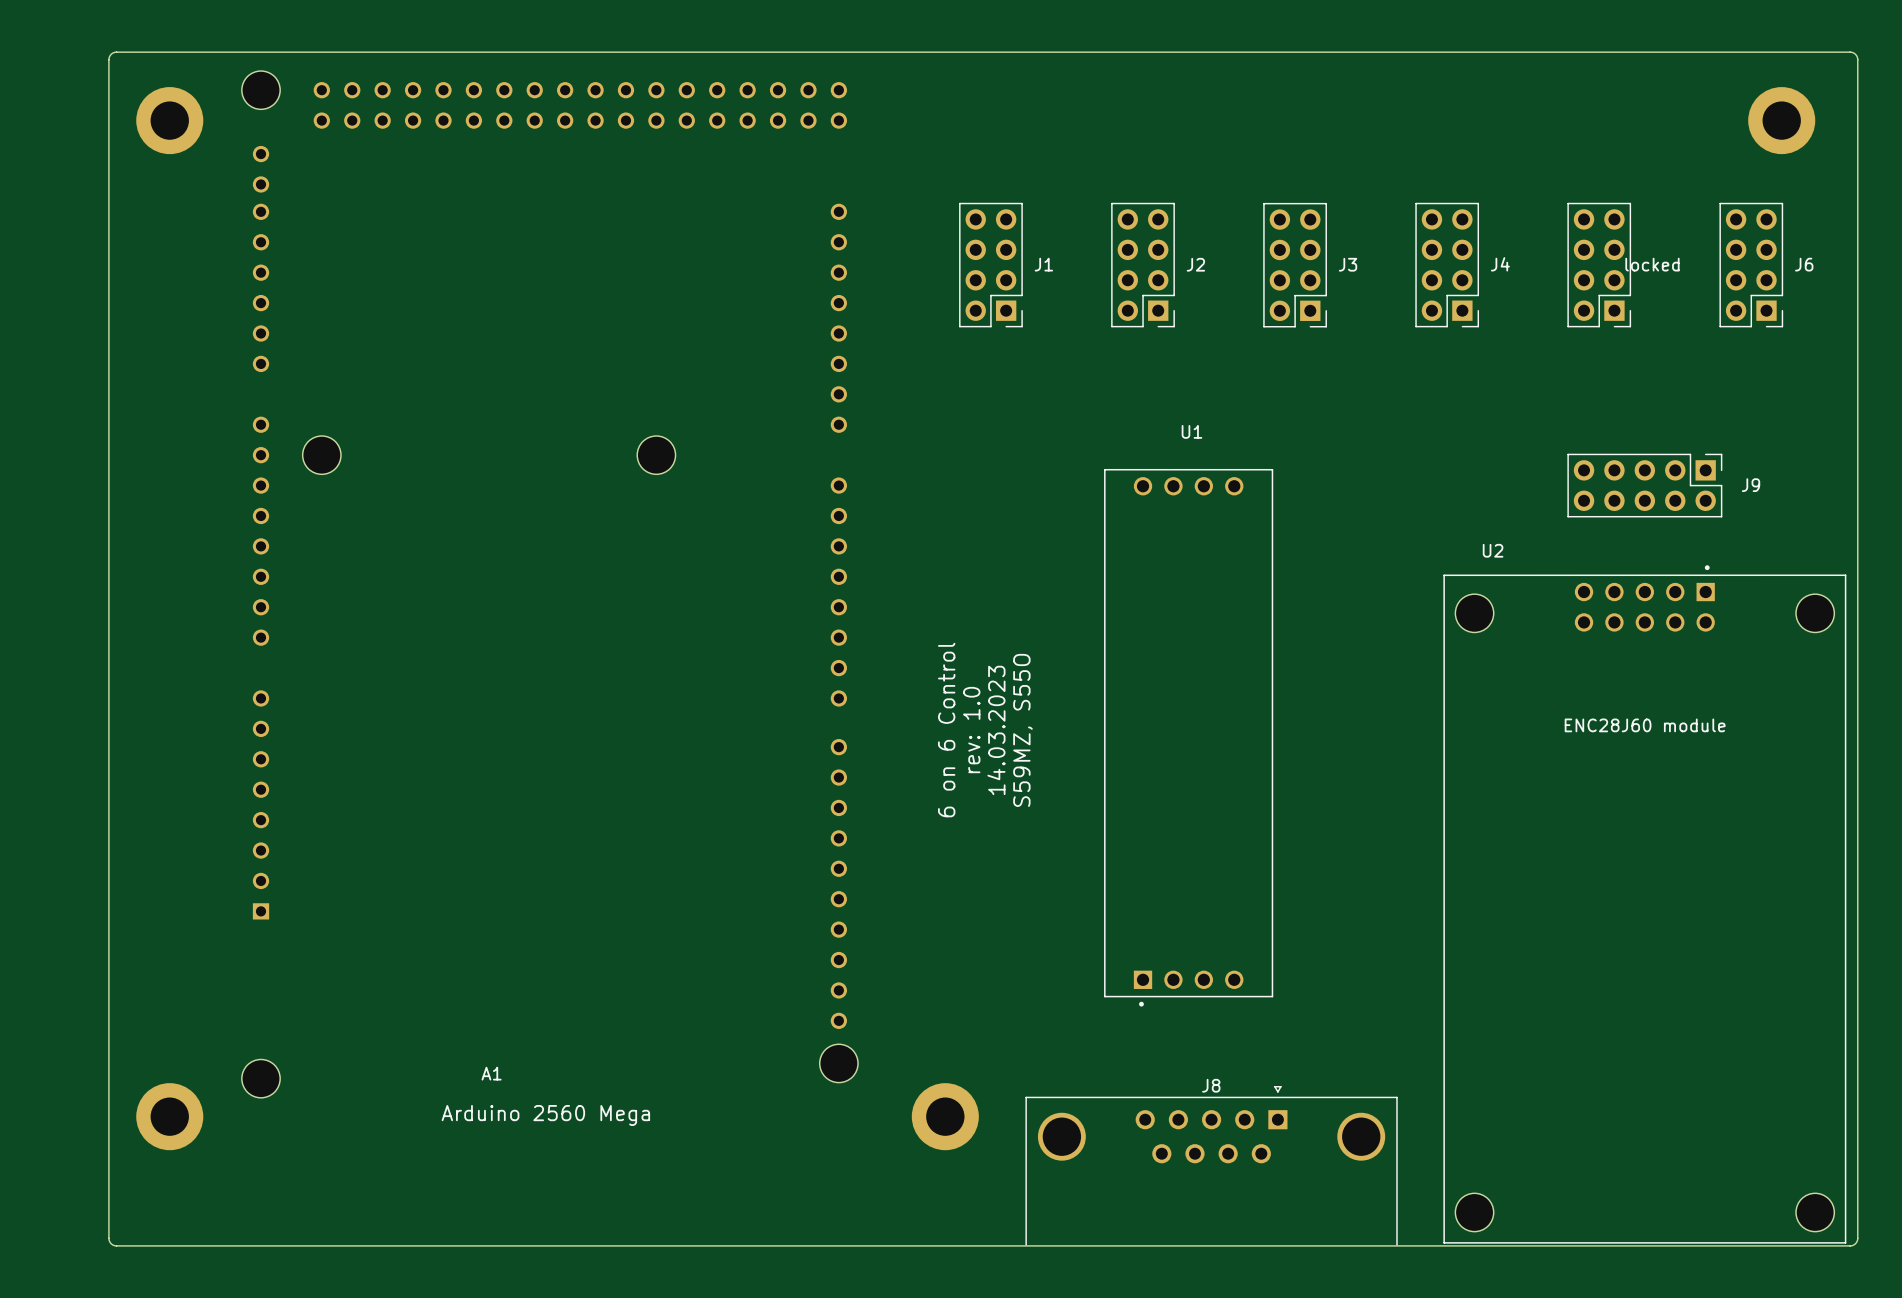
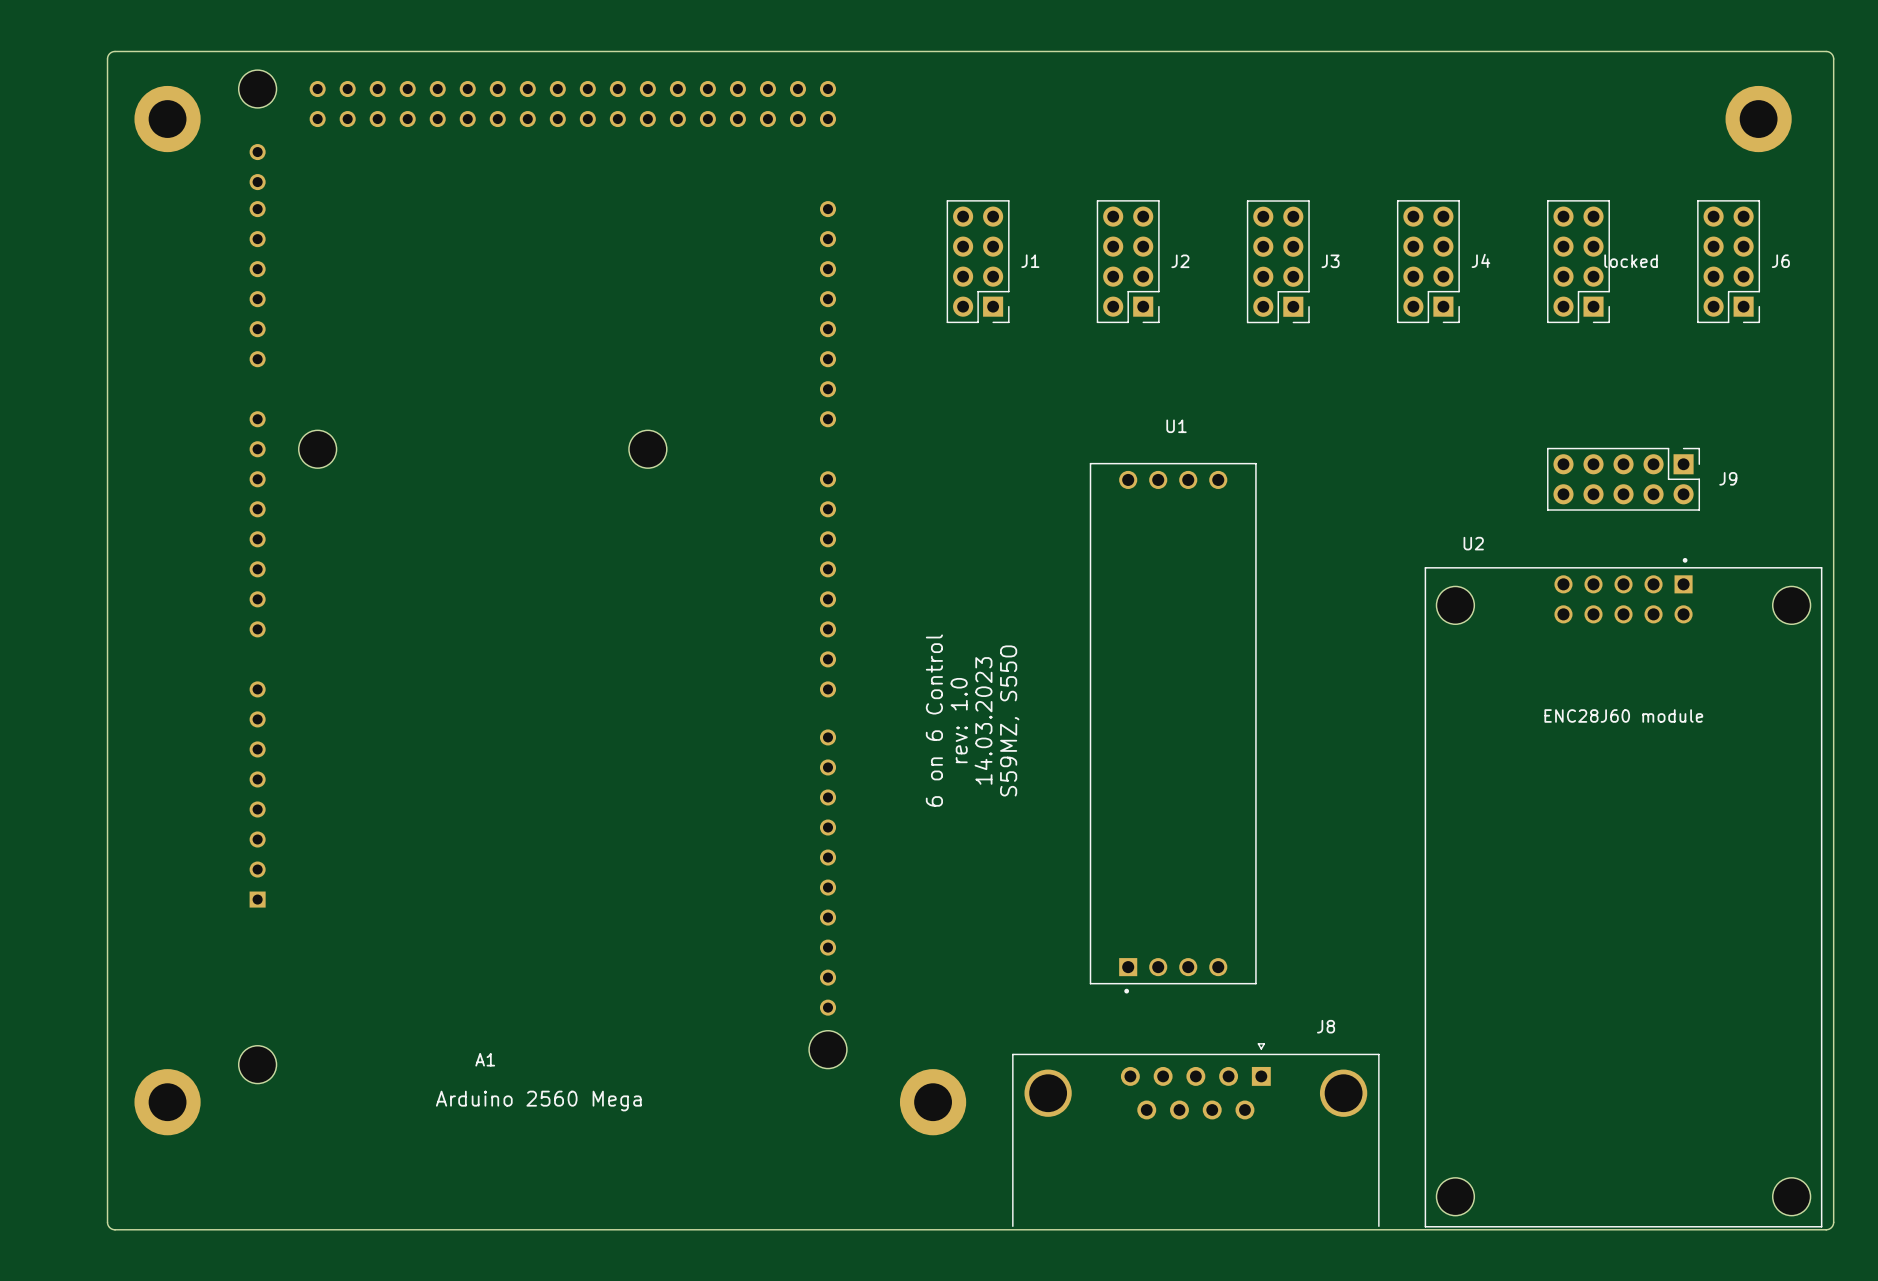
J8 name position: J8 (1211, 1085) -> J8 (1326, 1026)
J8 footprint: [1025, 1086, 1398, 1246] -> [1012, 1043, 1380, 1227]

